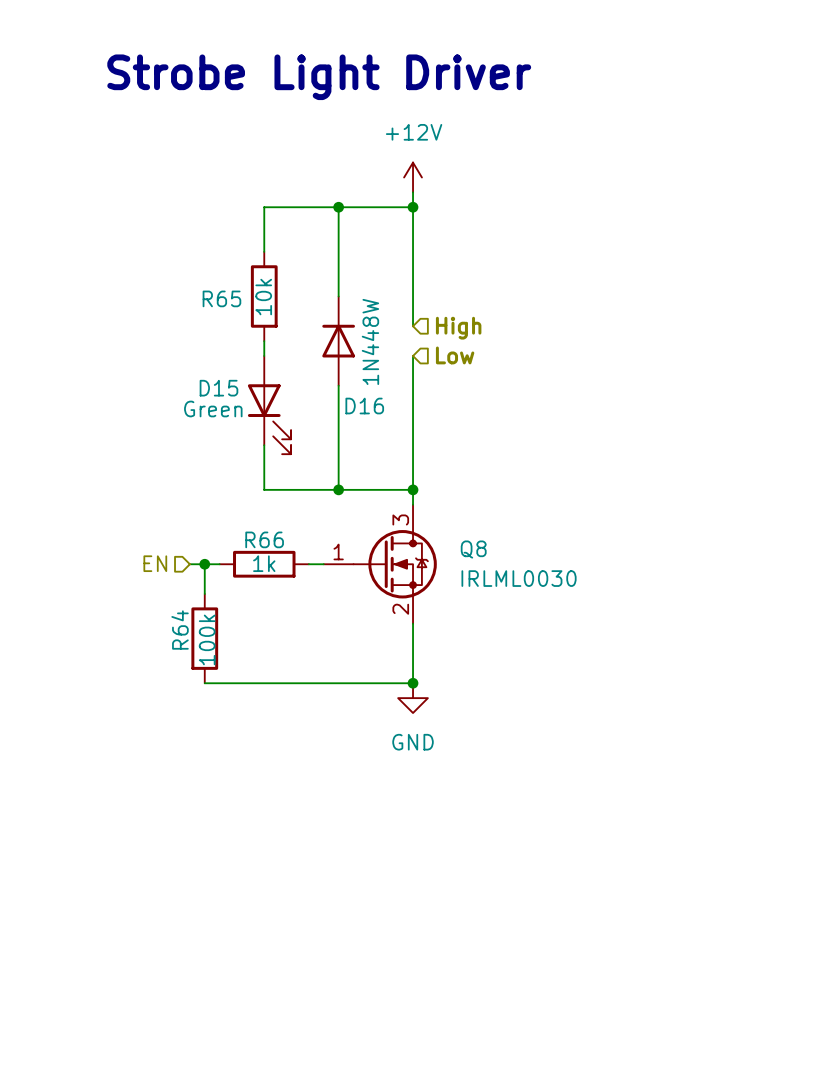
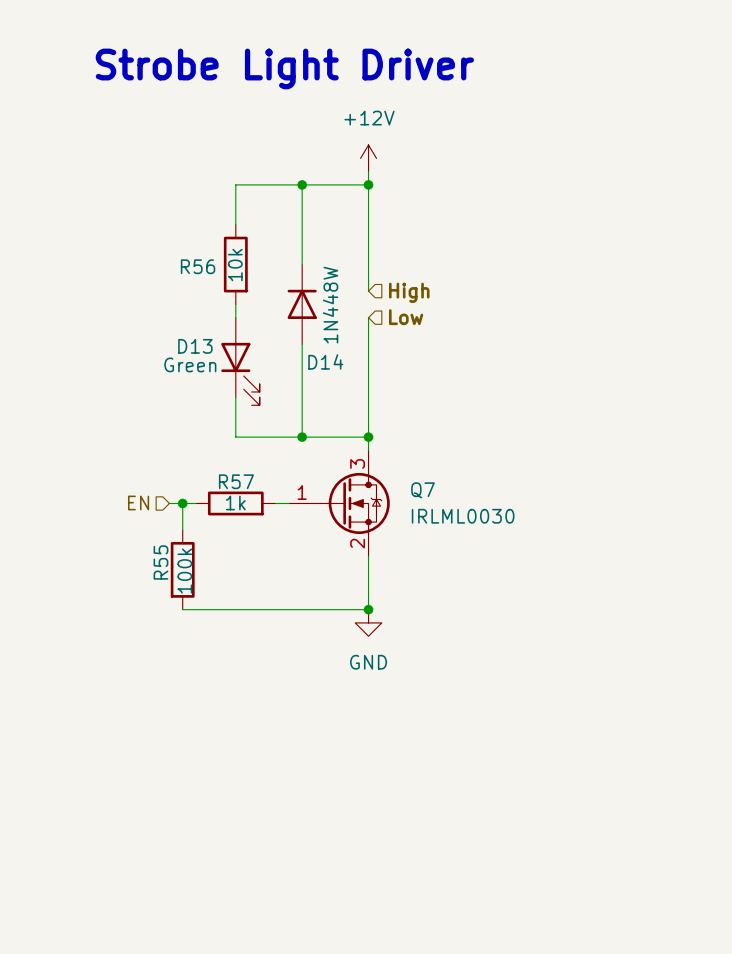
R65 name: R65 (221, 298) -> R56 (198, 266)
D15 name: D15 (218, 388) -> D13 (195, 346)
D16 name: D16 (364, 406) -> D14 (325, 361)
R66 name: R66 (264, 539) -> R57 (236, 481)
Q8 name: Q8 (473, 549) -> Q7 (422, 490)
R64 name: R64 (180, 630) -> R55 (160, 562)

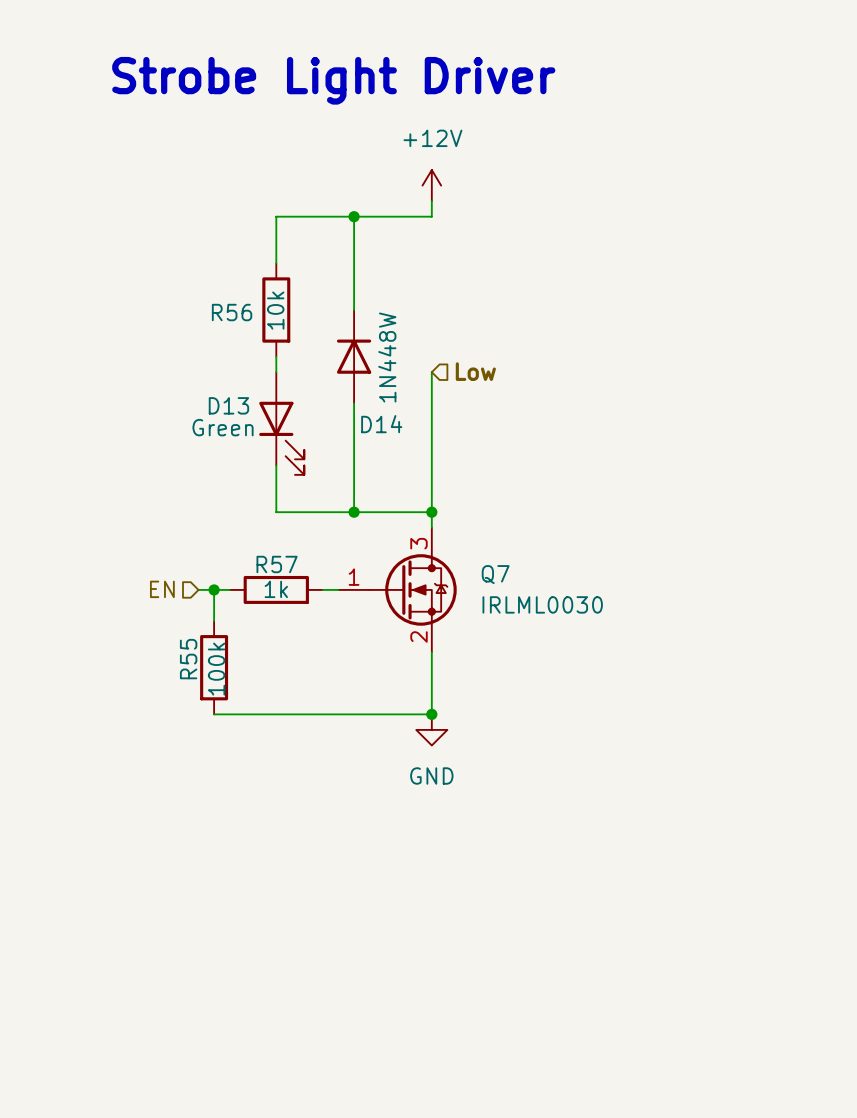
wire: (368, 184) (368, 291) -> none
junction: (368, 184) -> none
hierarchical label: High (409, 292) -> none

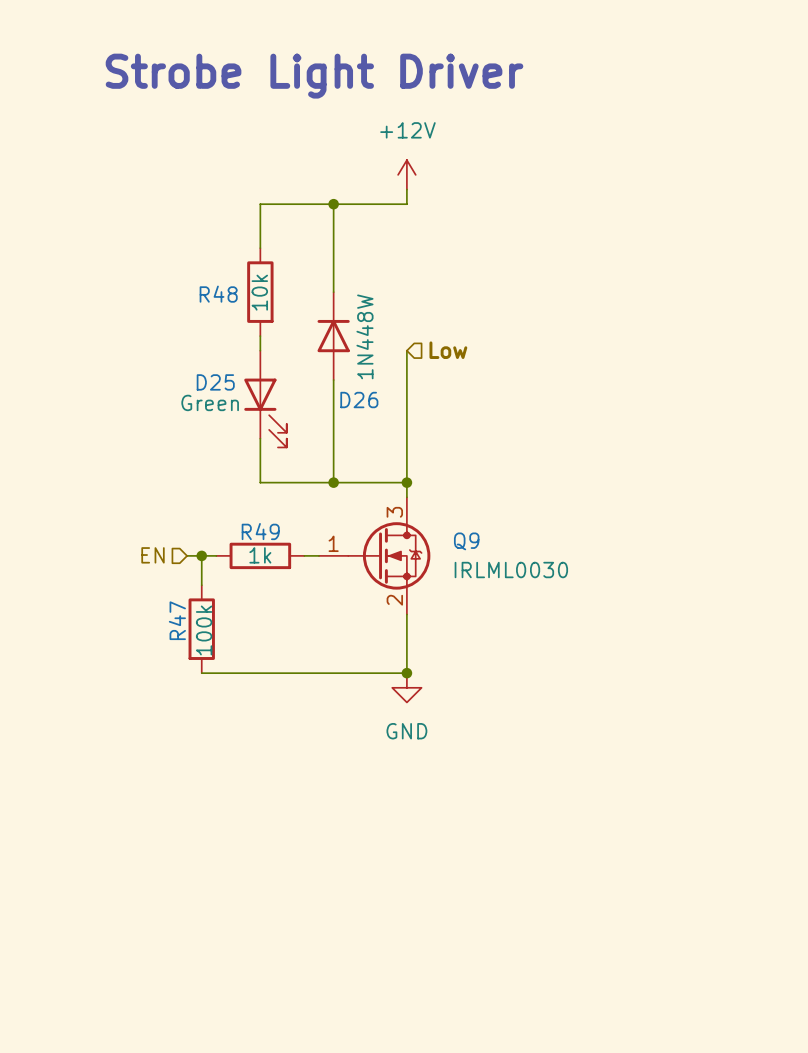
R56 name: R56 (232, 312) -> R48 (218, 294)
D13 name: D13 (228, 405) -> D25 (215, 382)
D14 name: D14 (381, 424) -> D26 (359, 400)
R57 name: R57 (277, 564) -> R49 (260, 531)
Q7 name: Q7 (495, 574) -> Q9 (466, 541)
R55 name: R55 (188, 659) -> R47 (177, 620)

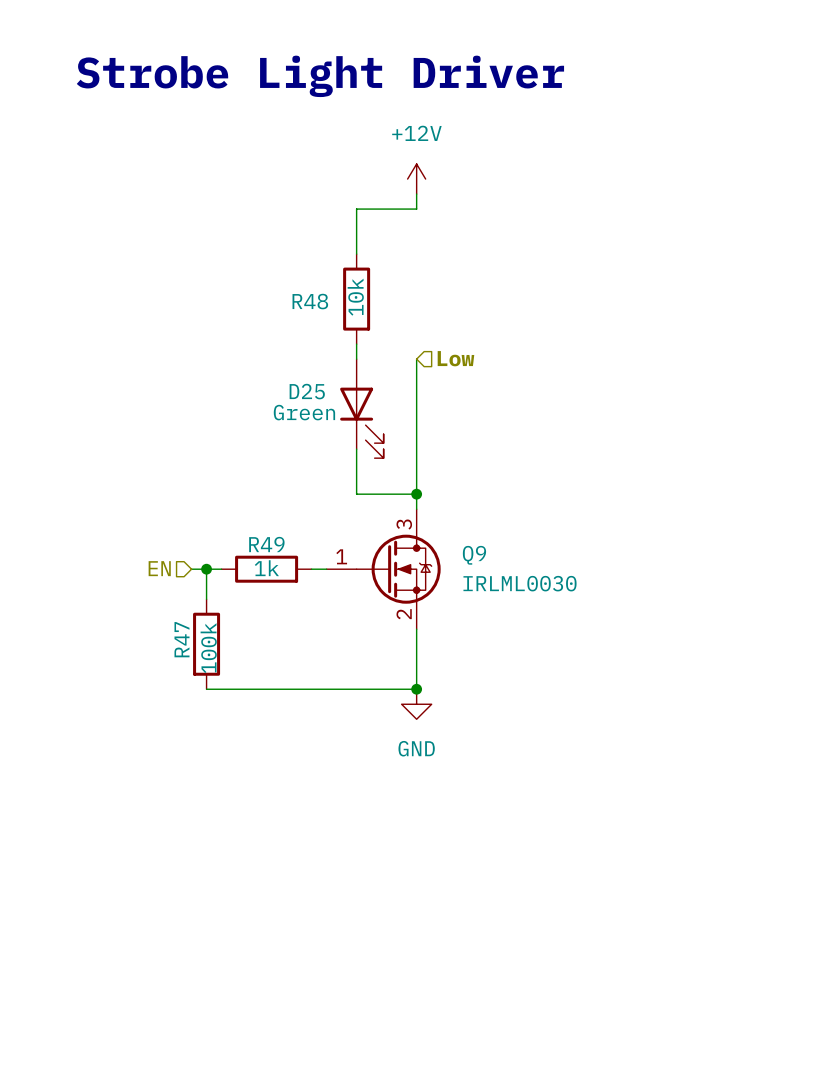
wire: (333, 204) (333, 292) -> none
junction: (333, 204) -> none
wire: (348, 204) (260, 204) (260, 248) -> (356, 209) (356, 254)
R48 position: (260, 292) -> (356, 299)
wire: (260, 336) (260, 350) -> (356, 344) (356, 359)
D26: 1N448W (333, 336) -> none
wire: (333, 380) (333, 482) -> none
D25 position: (265, 399) -> (361, 408)
wire: (260, 438) (260, 482) (348, 482) -> (356, 449) (356, 494)
junction: (333, 482) -> none

